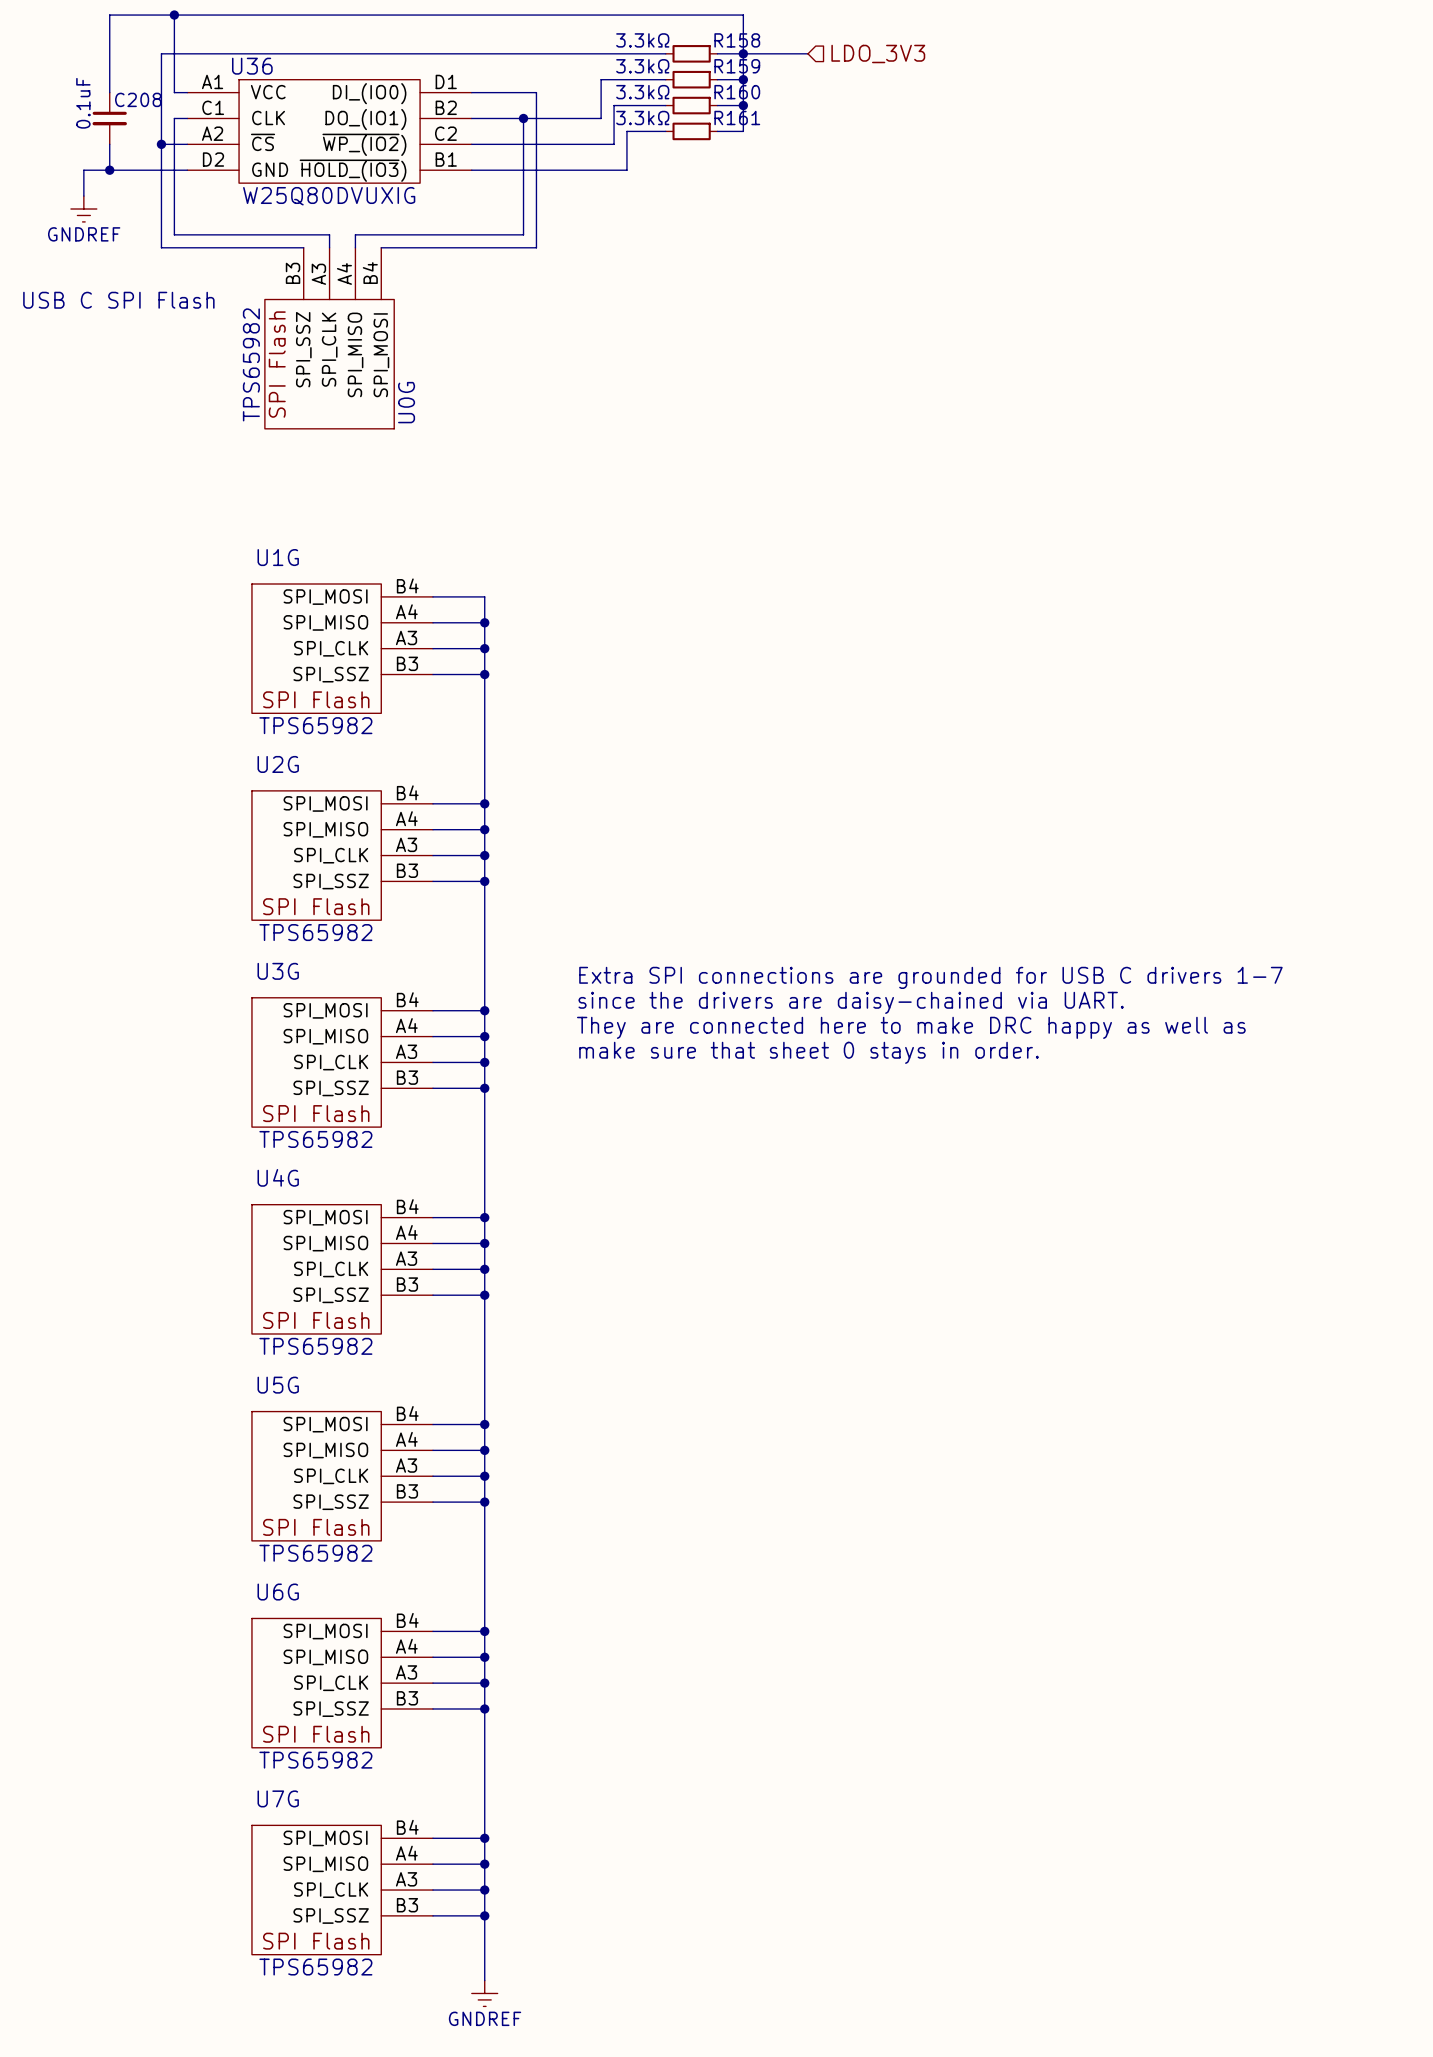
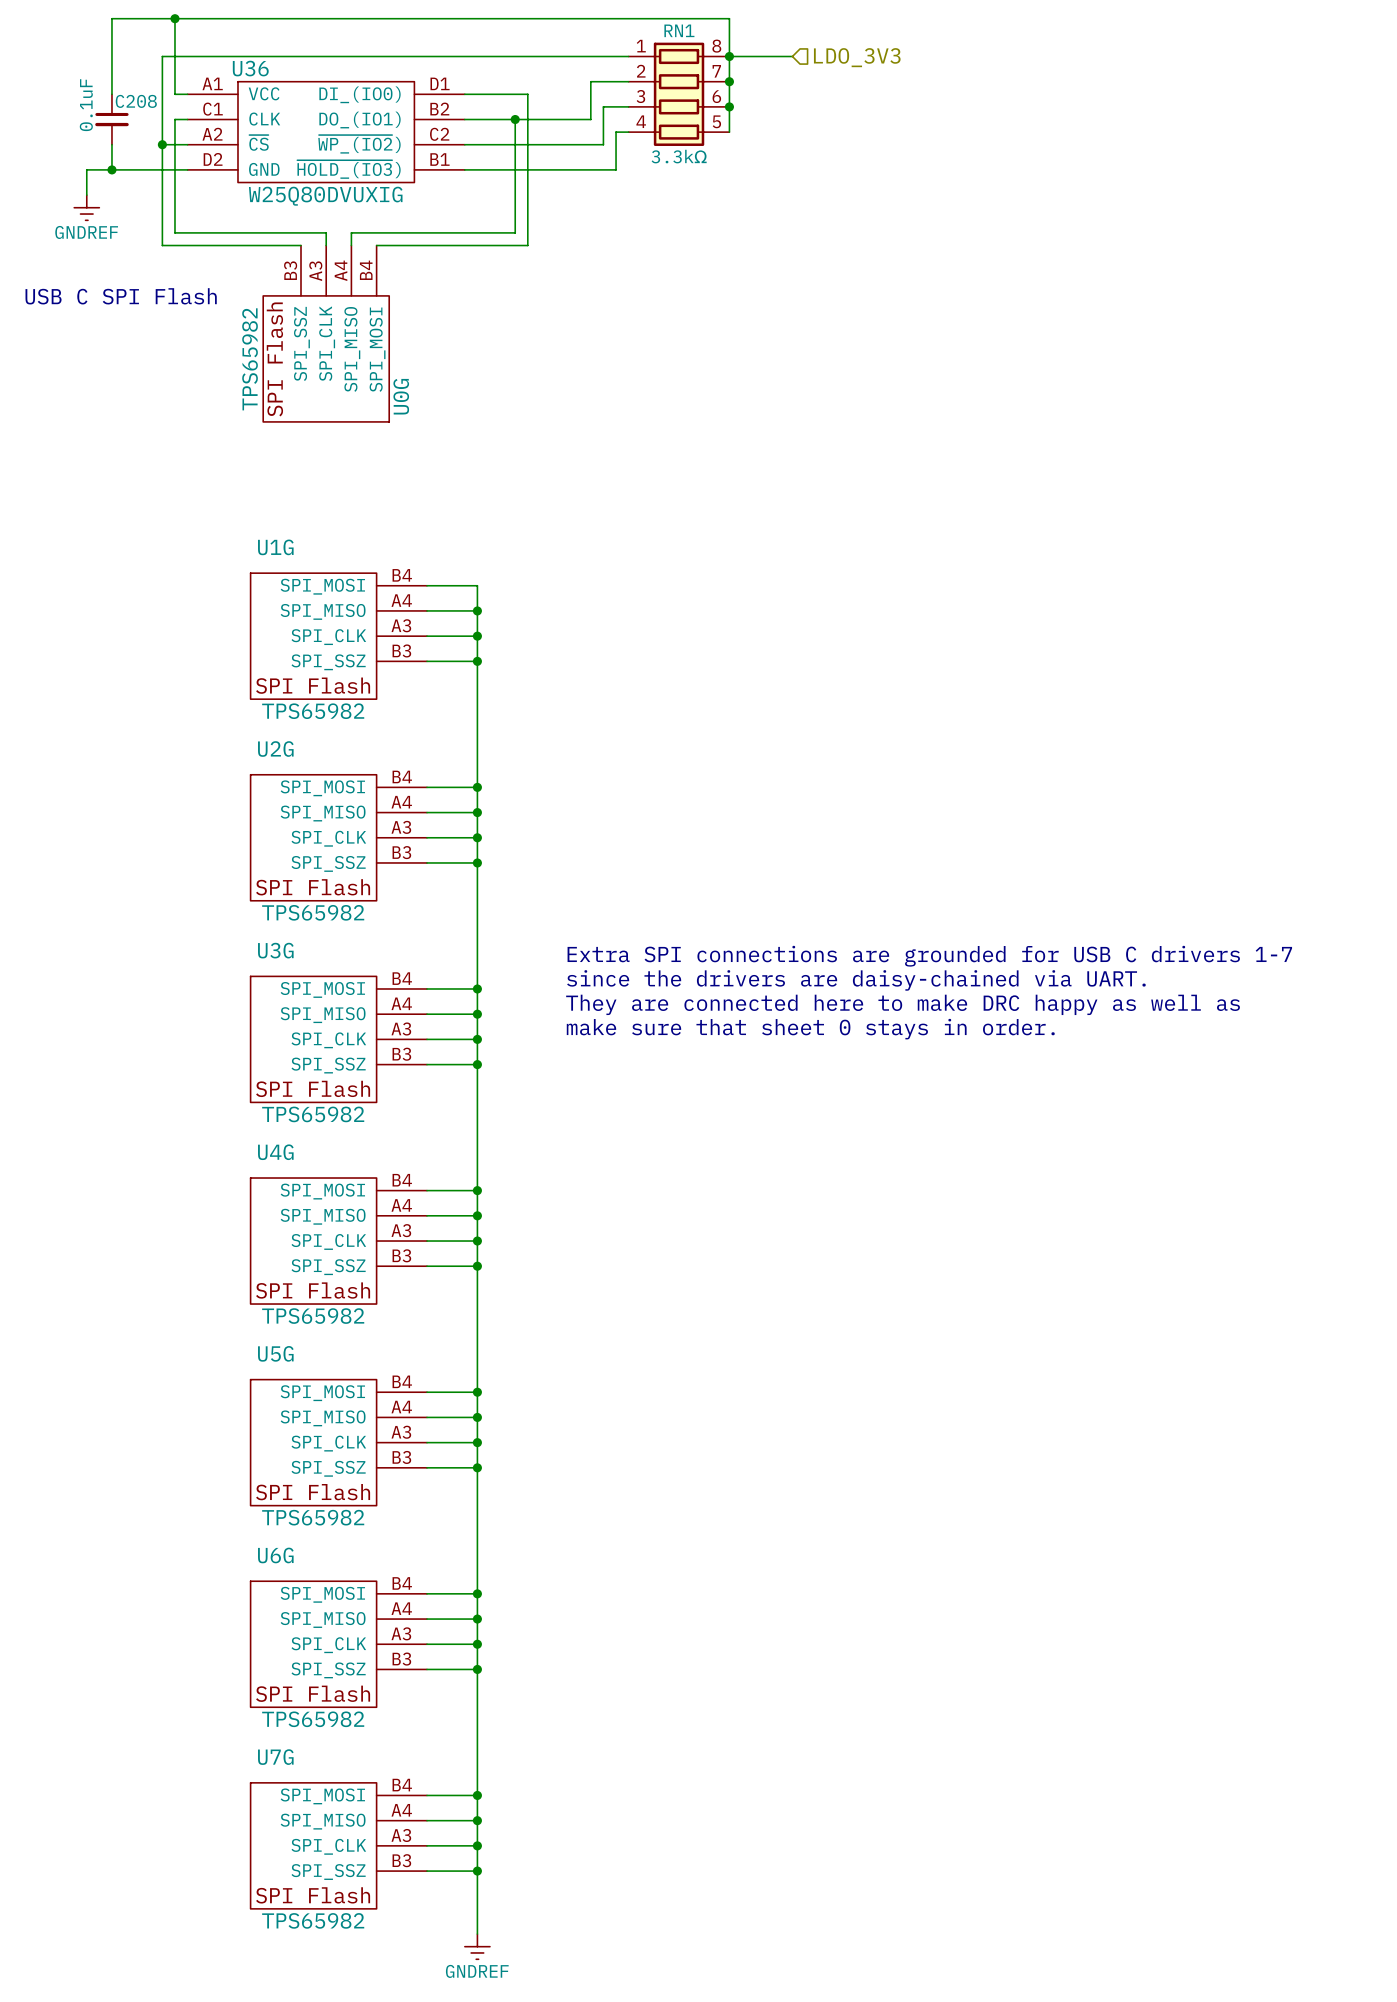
R158: 3.3kΩ (691, 53) -> none
R159: 3.3kΩ (691, 79) -> none
RN1: none -> 3.3kΩ (679, 94)
R160: 3.3kΩ (691, 105) -> none
R161: 3.3kΩ (691, 131) -> none

